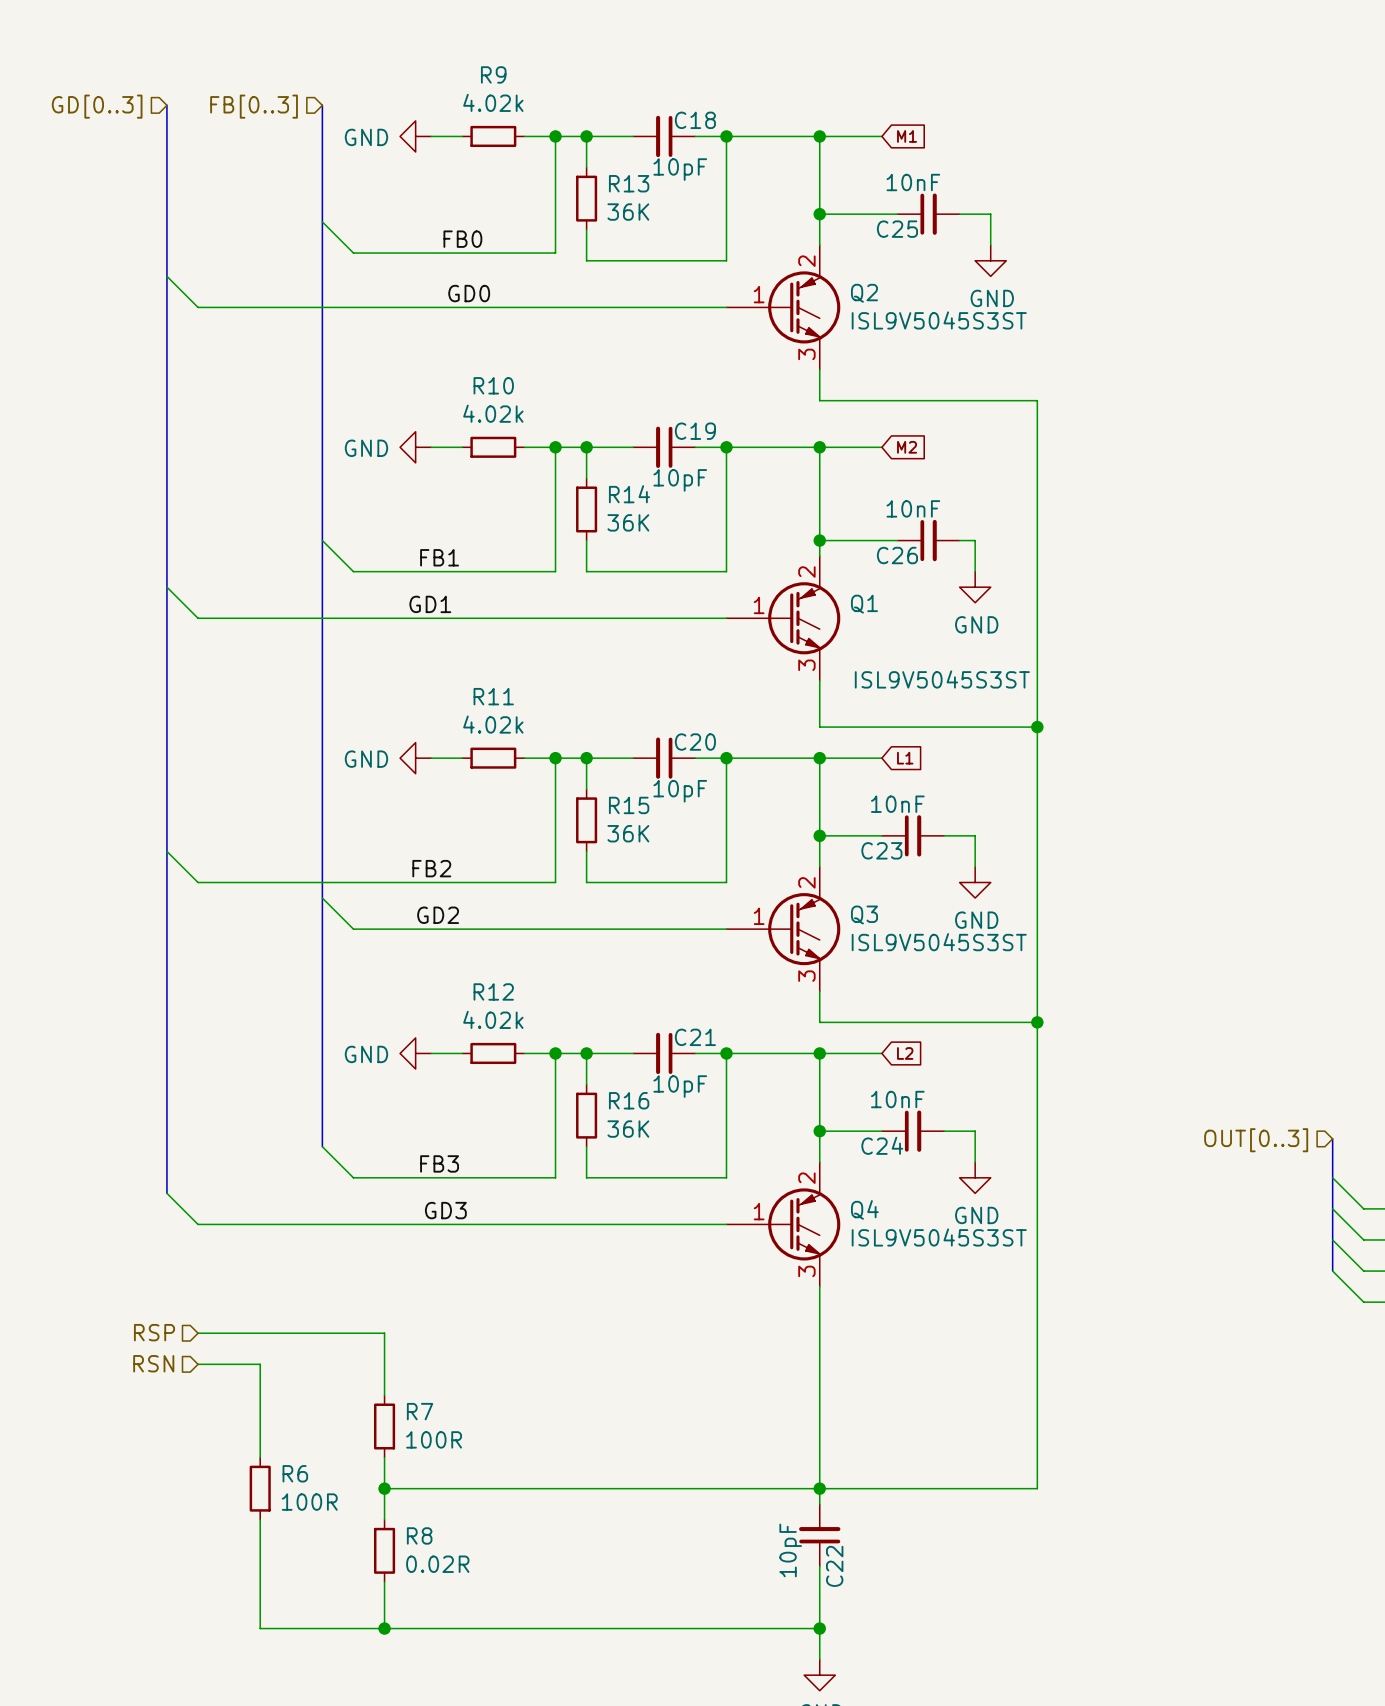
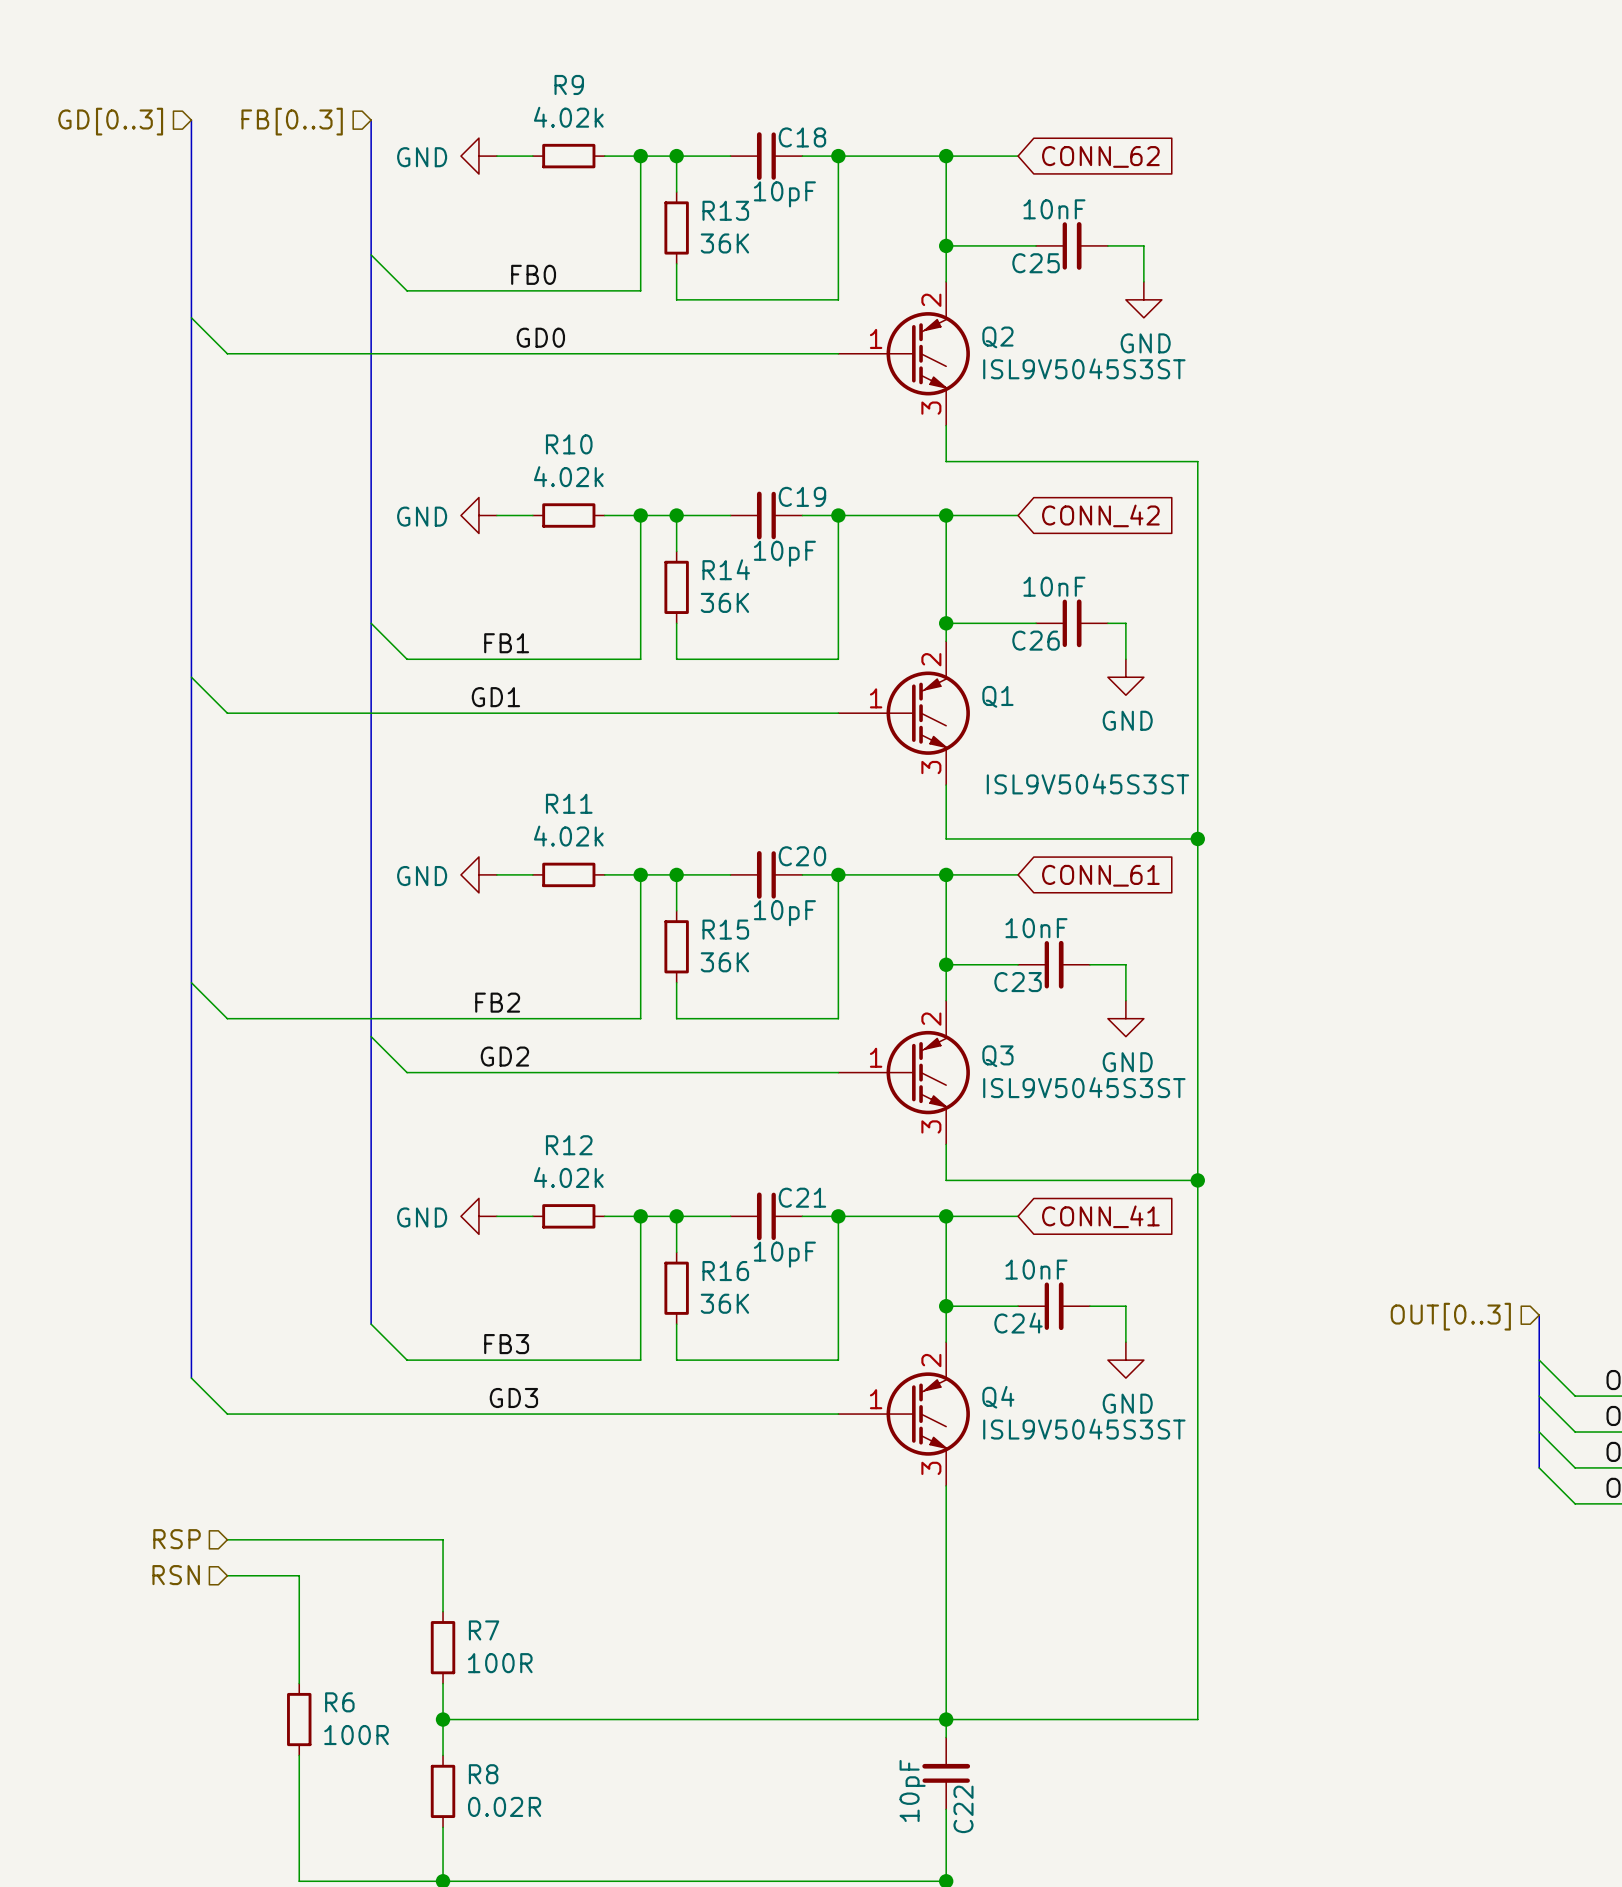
global label: M1 (907, 136) -> CONN_62 (1100, 156)
global label: M2 (907, 447) -> CONN_42 (1100, 515)
global label: L1 (905, 758) -> CONN_61 (1100, 875)
global label: L2 (905, 1053) -> CONN_41 (1100, 1216)

